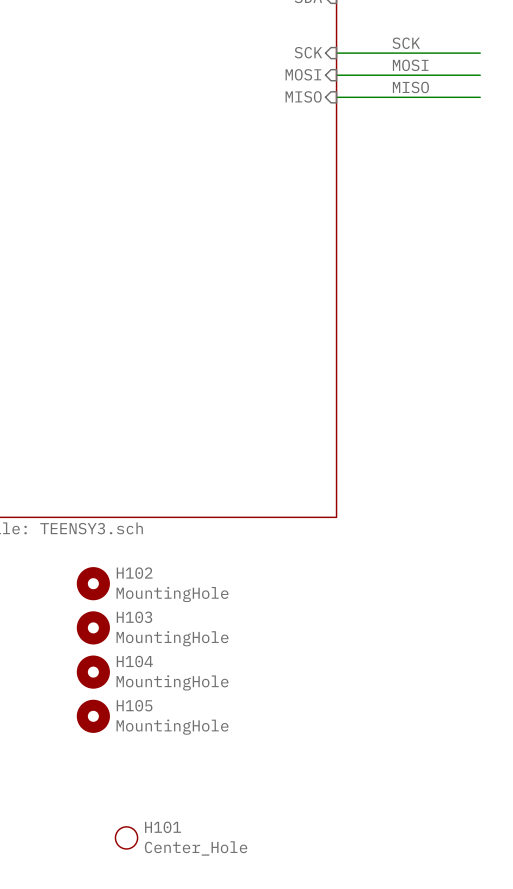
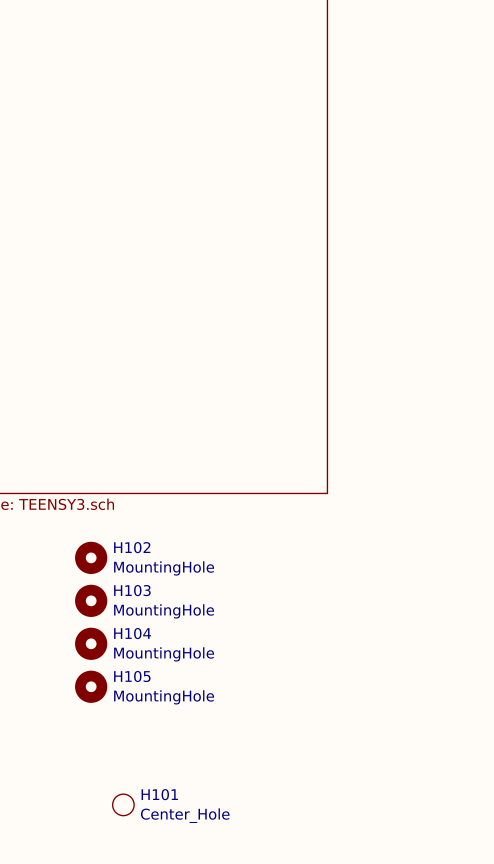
label: SCK (406, 43) -> none
sheet pin: SCK (308, 52) -> none
wire: (336, 53) (480, 53) -> none
label: MOSI (410, 65) -> none
sheet pin: MOSI (303, 74) -> none
wire: (336, 75) (480, 75) -> none
label: MISO (410, 87) -> none
sheet pin: MISO (303, 96) -> none
wire: (336, 97) (480, 97) -> none

